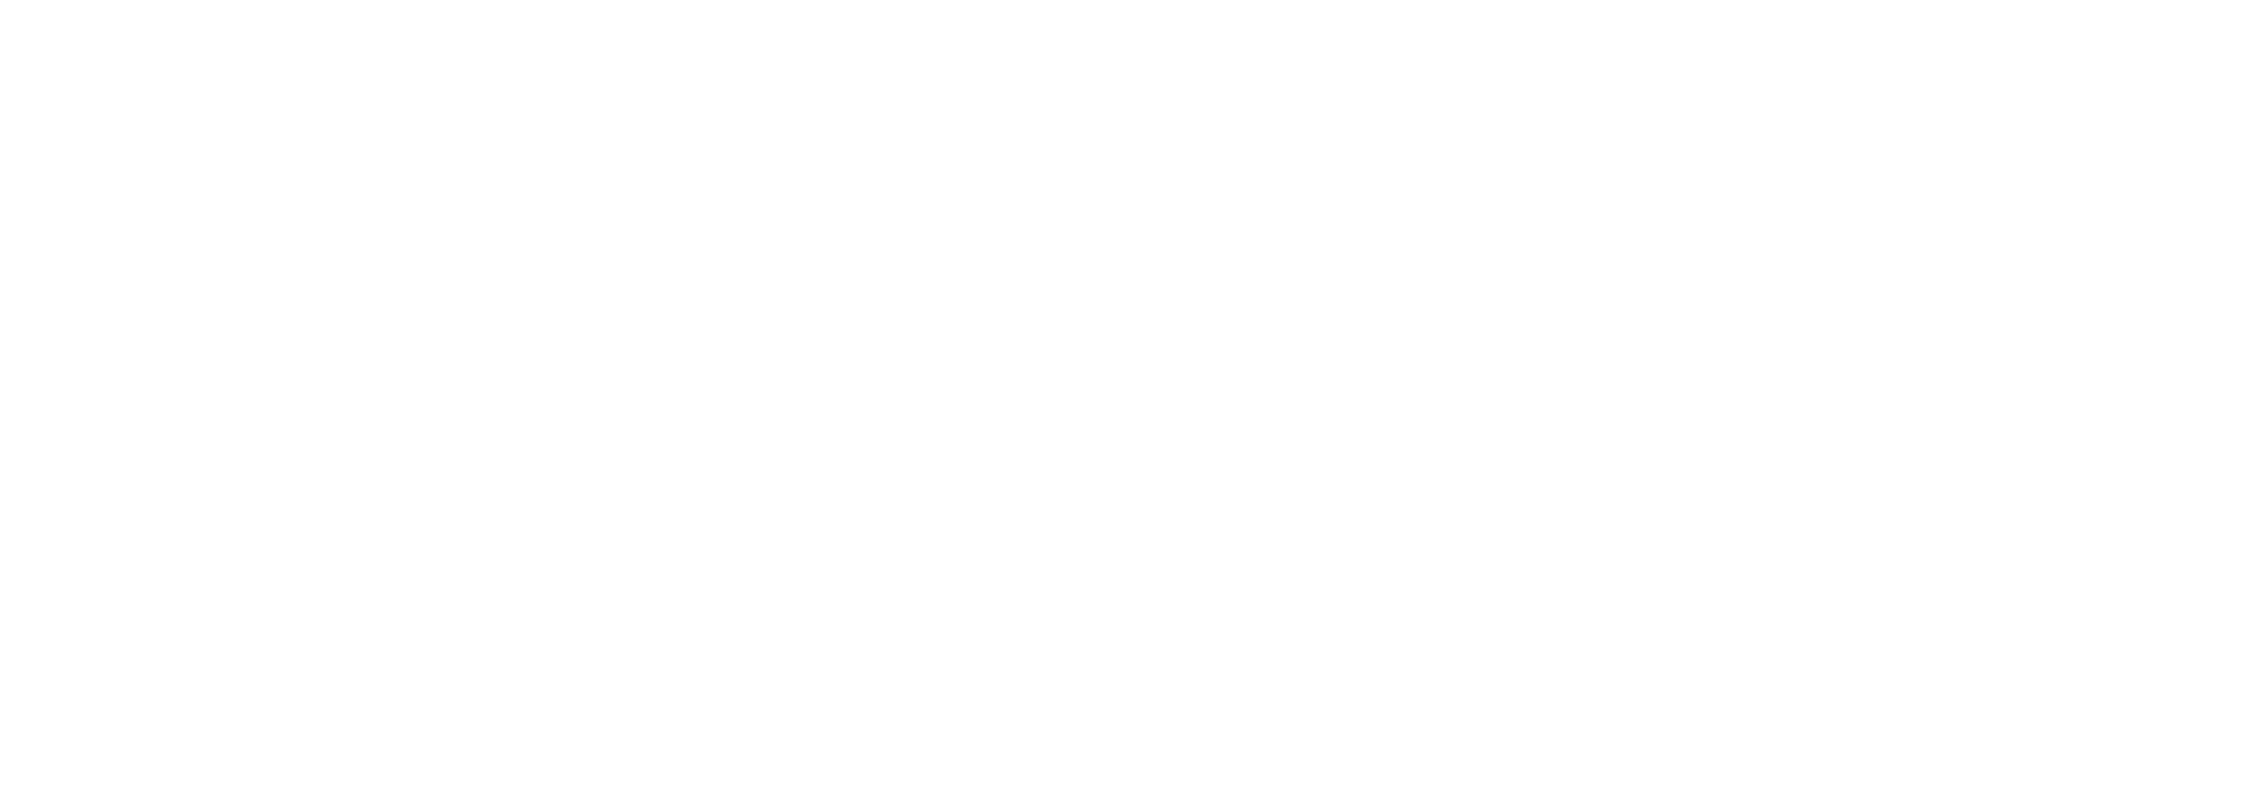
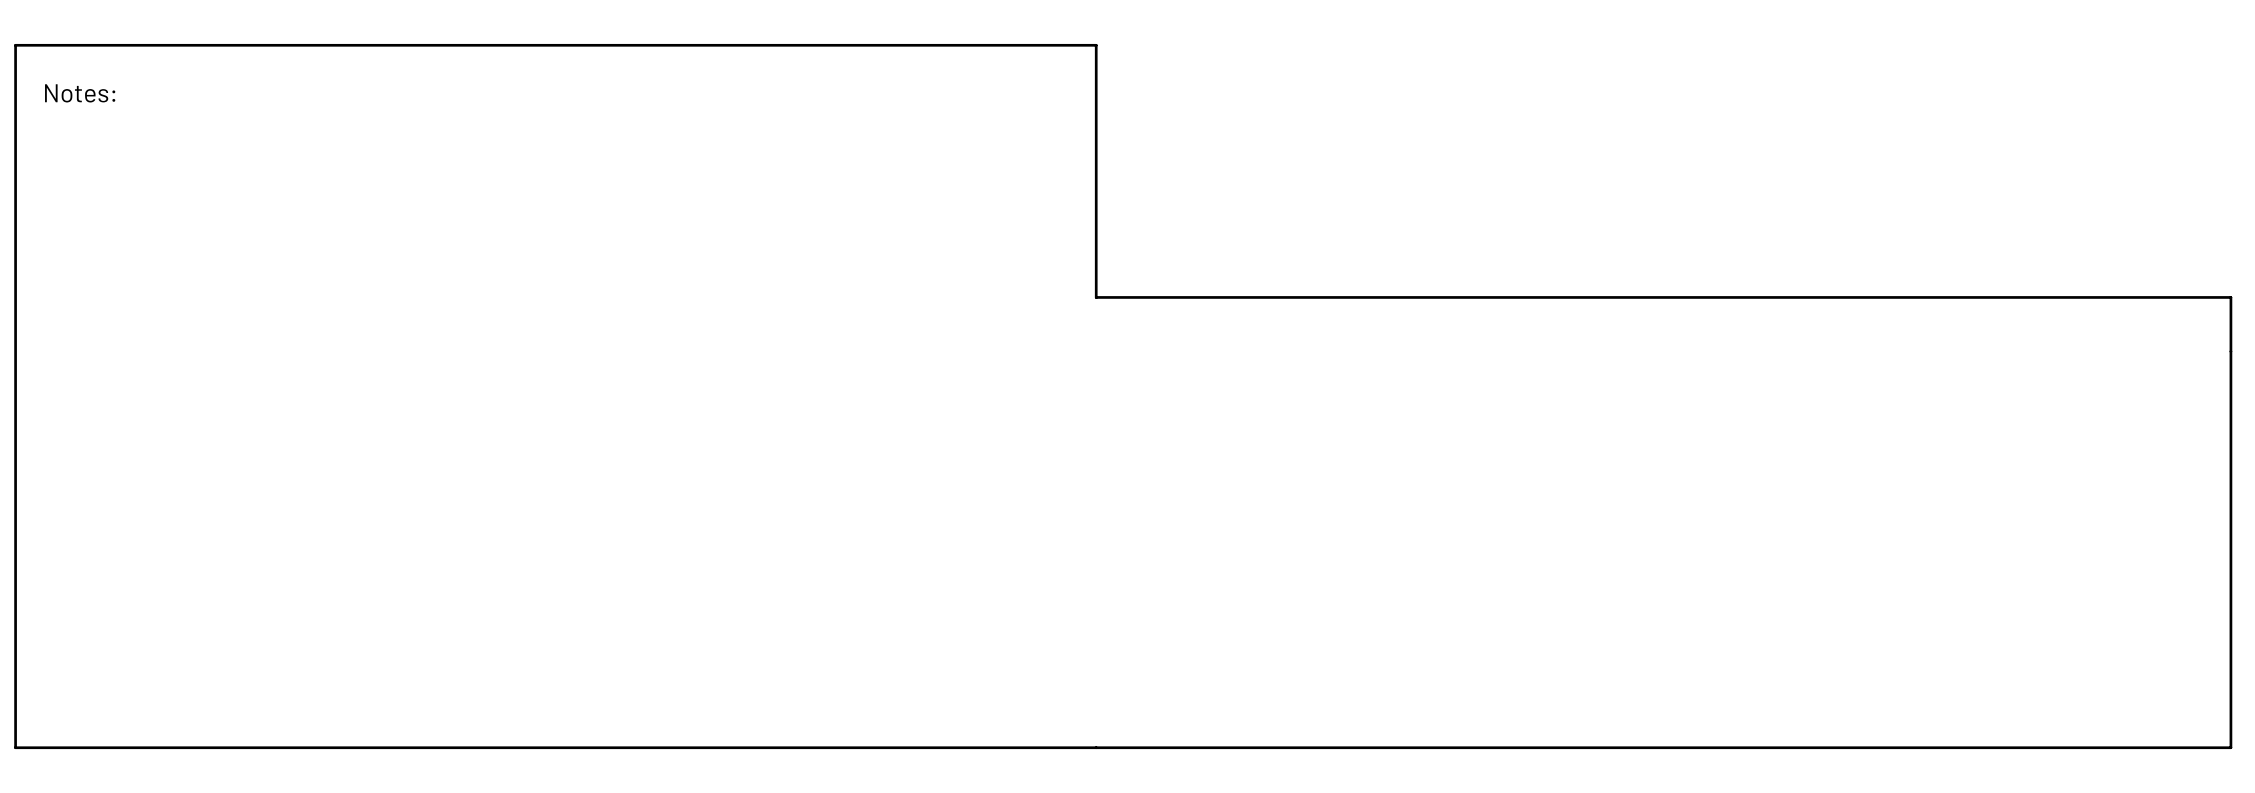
line: none -> (15, 45) (15, 747) (2230, 747) (2230, 297) (1096, 297) (1096, 45) (15, 45)
text: none -> Notes: (80, 93)

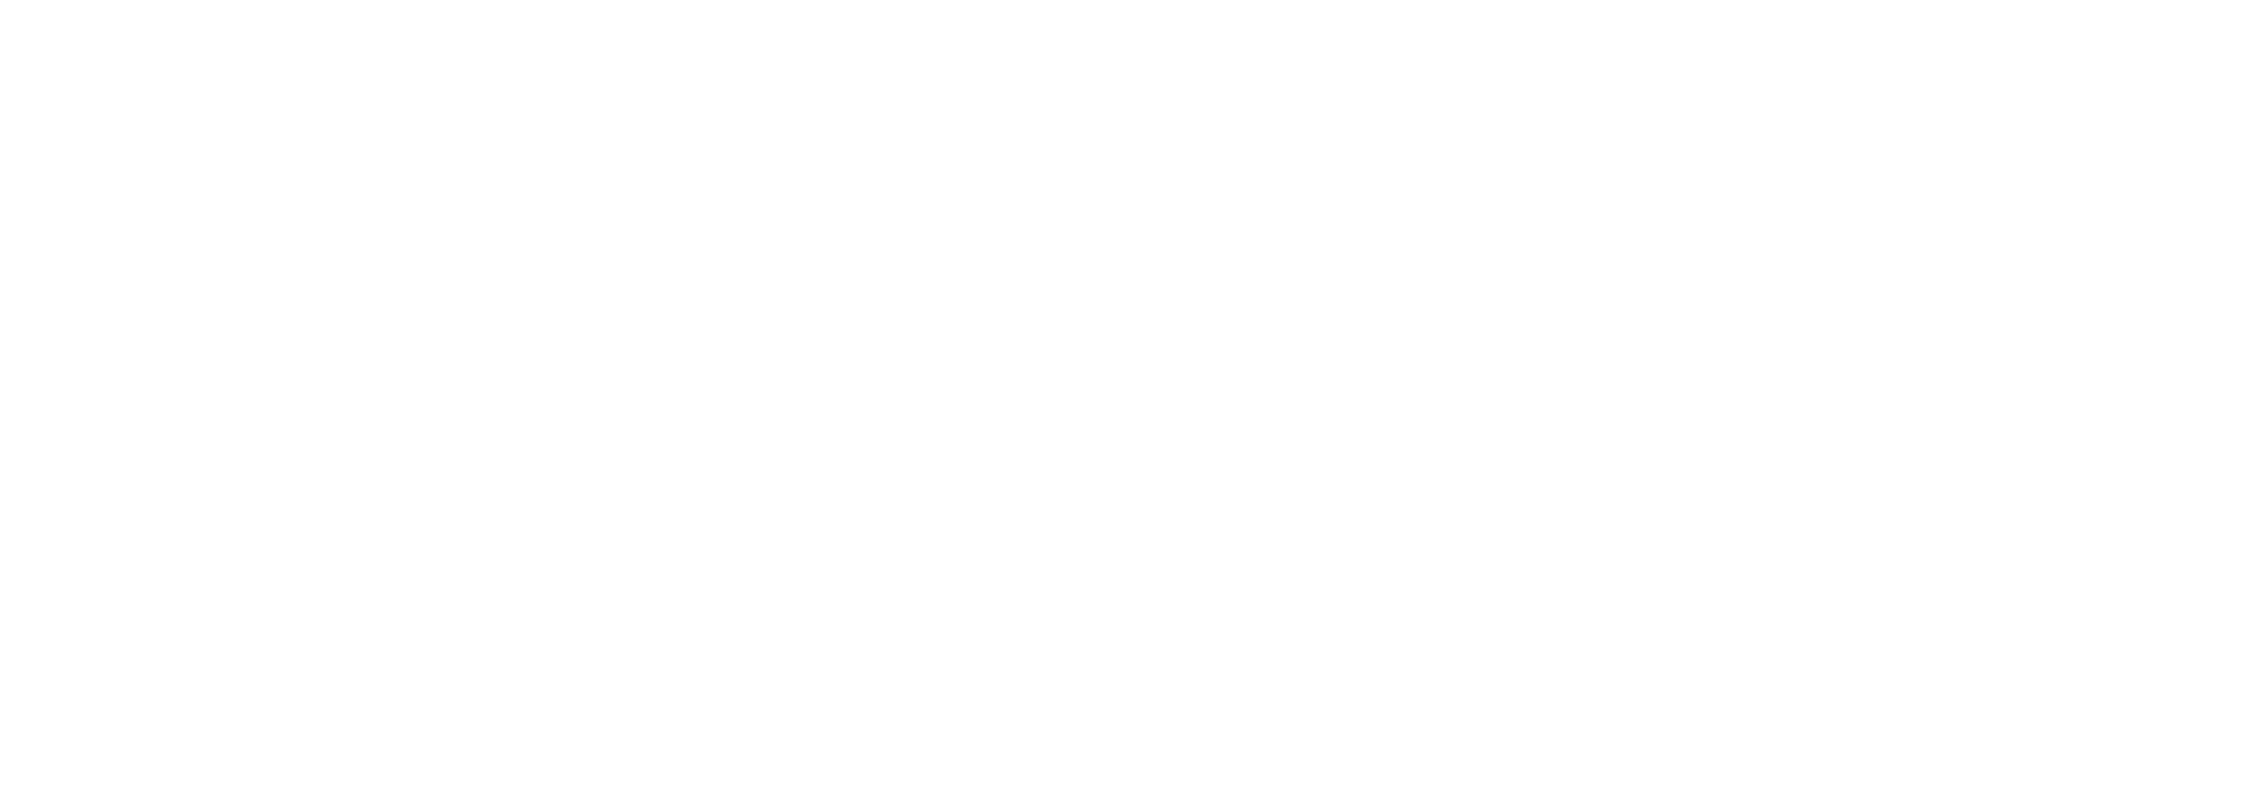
line: (15, 45) (15, 747) (2230, 747) (2230, 297) (1096, 297) (1096, 45) (15, 45) -> none
text: Notes: (80, 93) -> none

